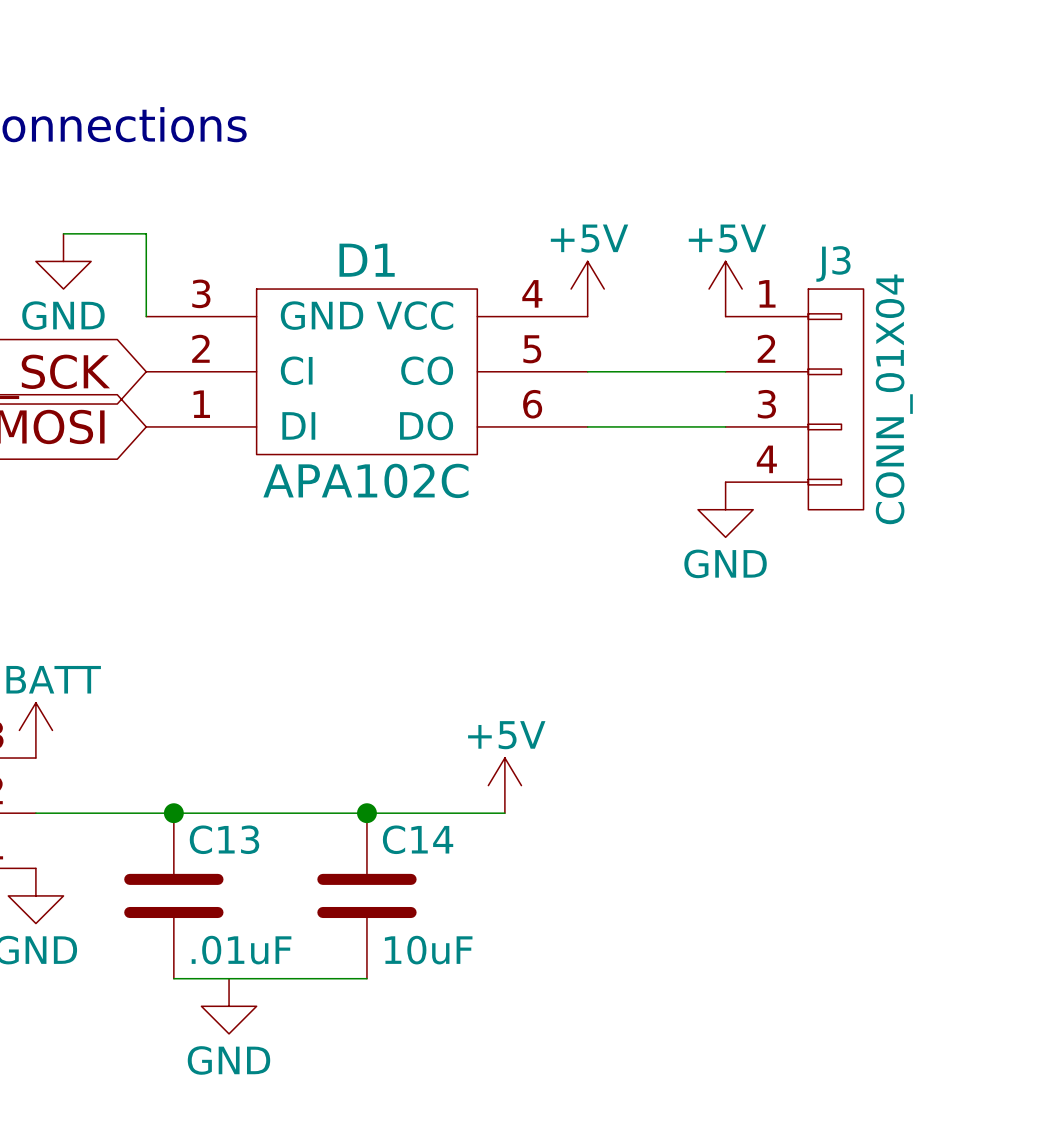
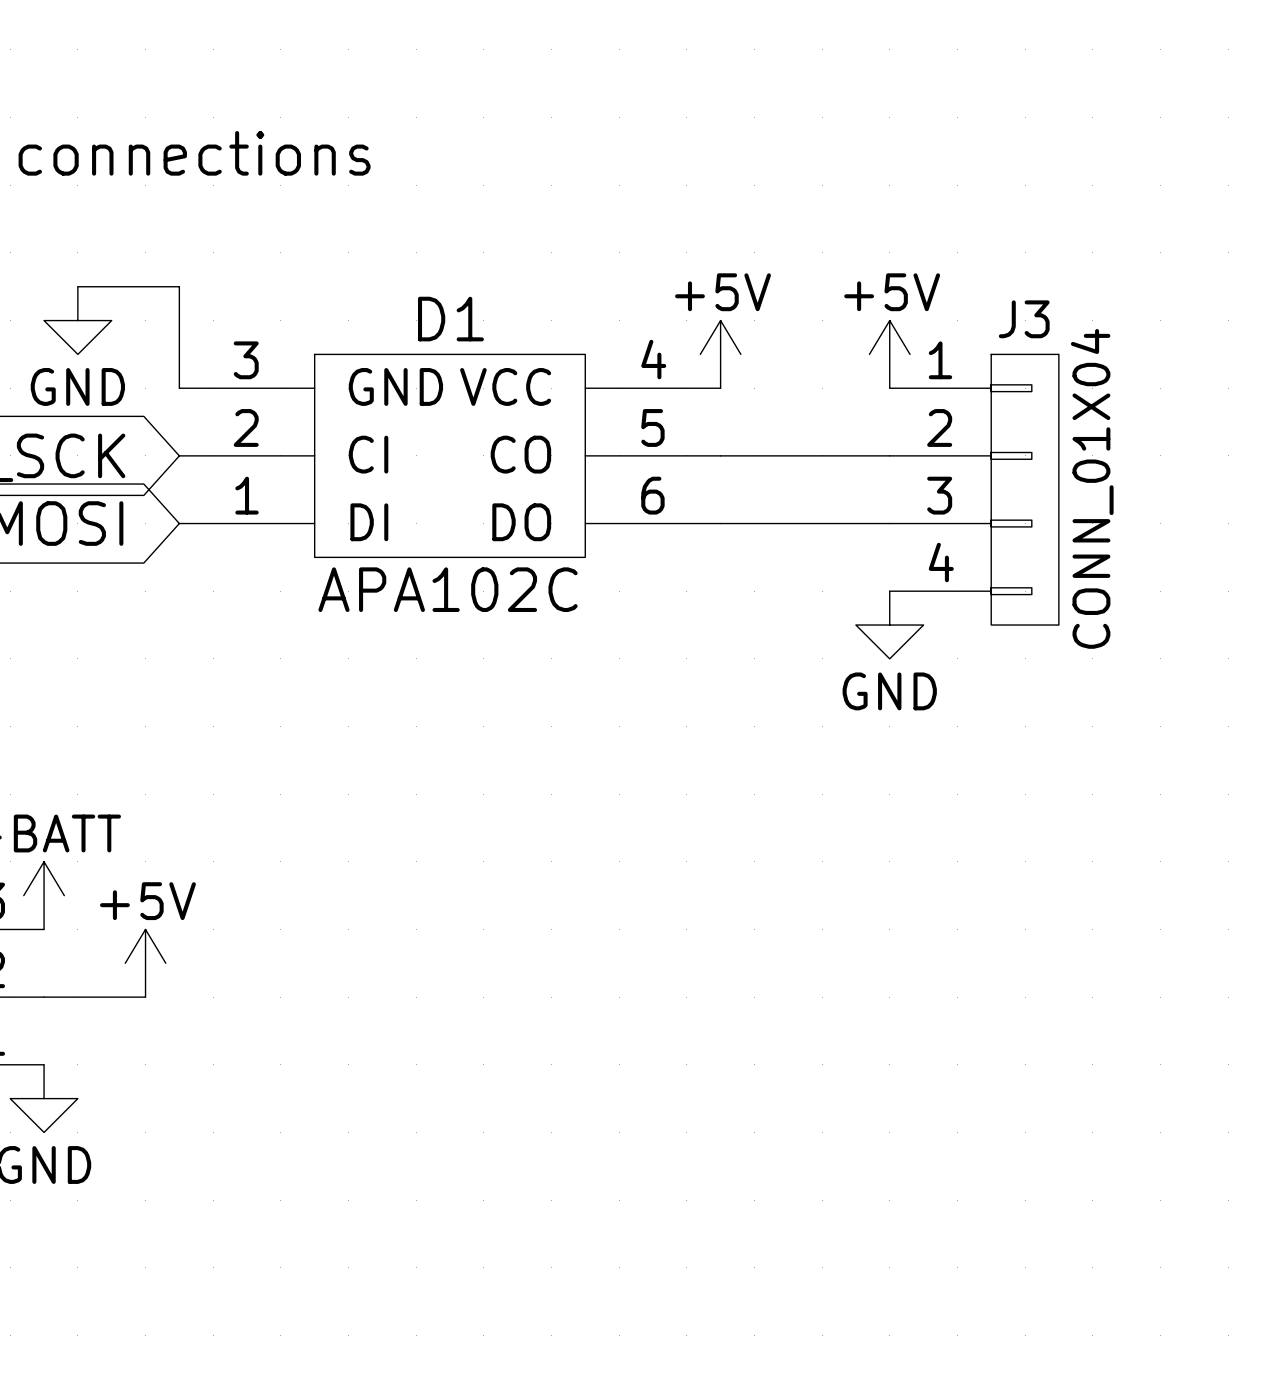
power symbol position: +5V (504, 785) -> +5V (145, 963)
wire: (118, 813) (504, 813) -> none
junction: (173, 813) -> none
junction: (366, 813) -> none
C13: .01uF (173, 895) -> none
C14: 10uF (366, 895) -> none
wire: (173, 978) (366, 978) -> none
power symbol: GND (229, 1006) -> none

